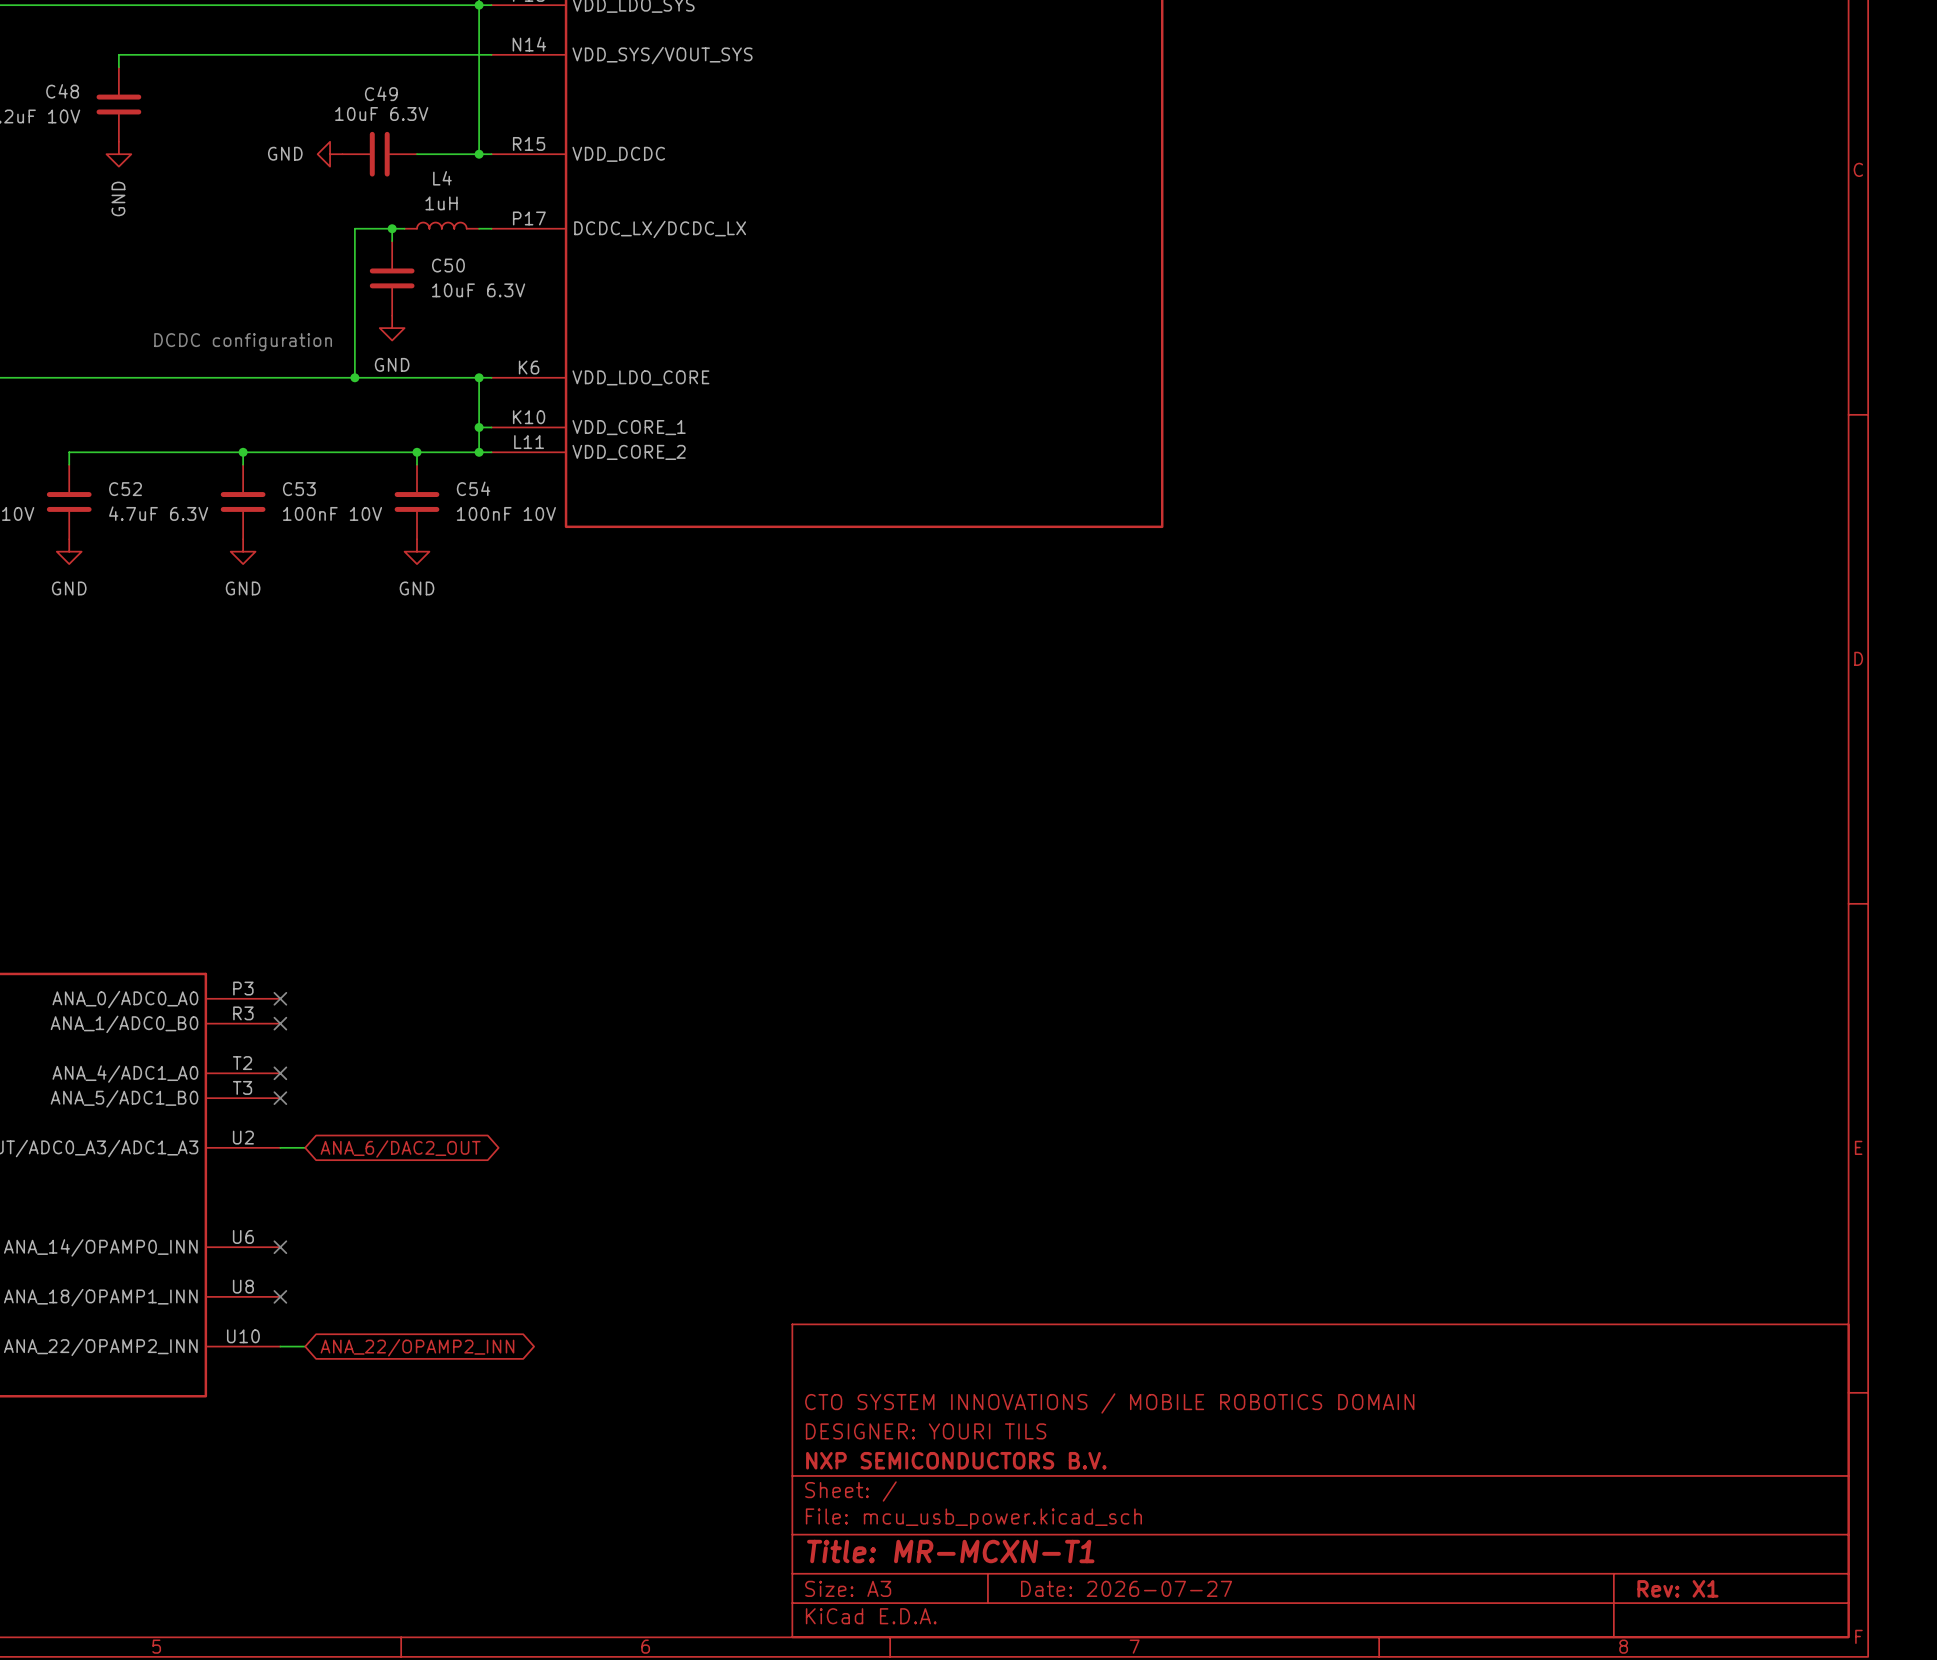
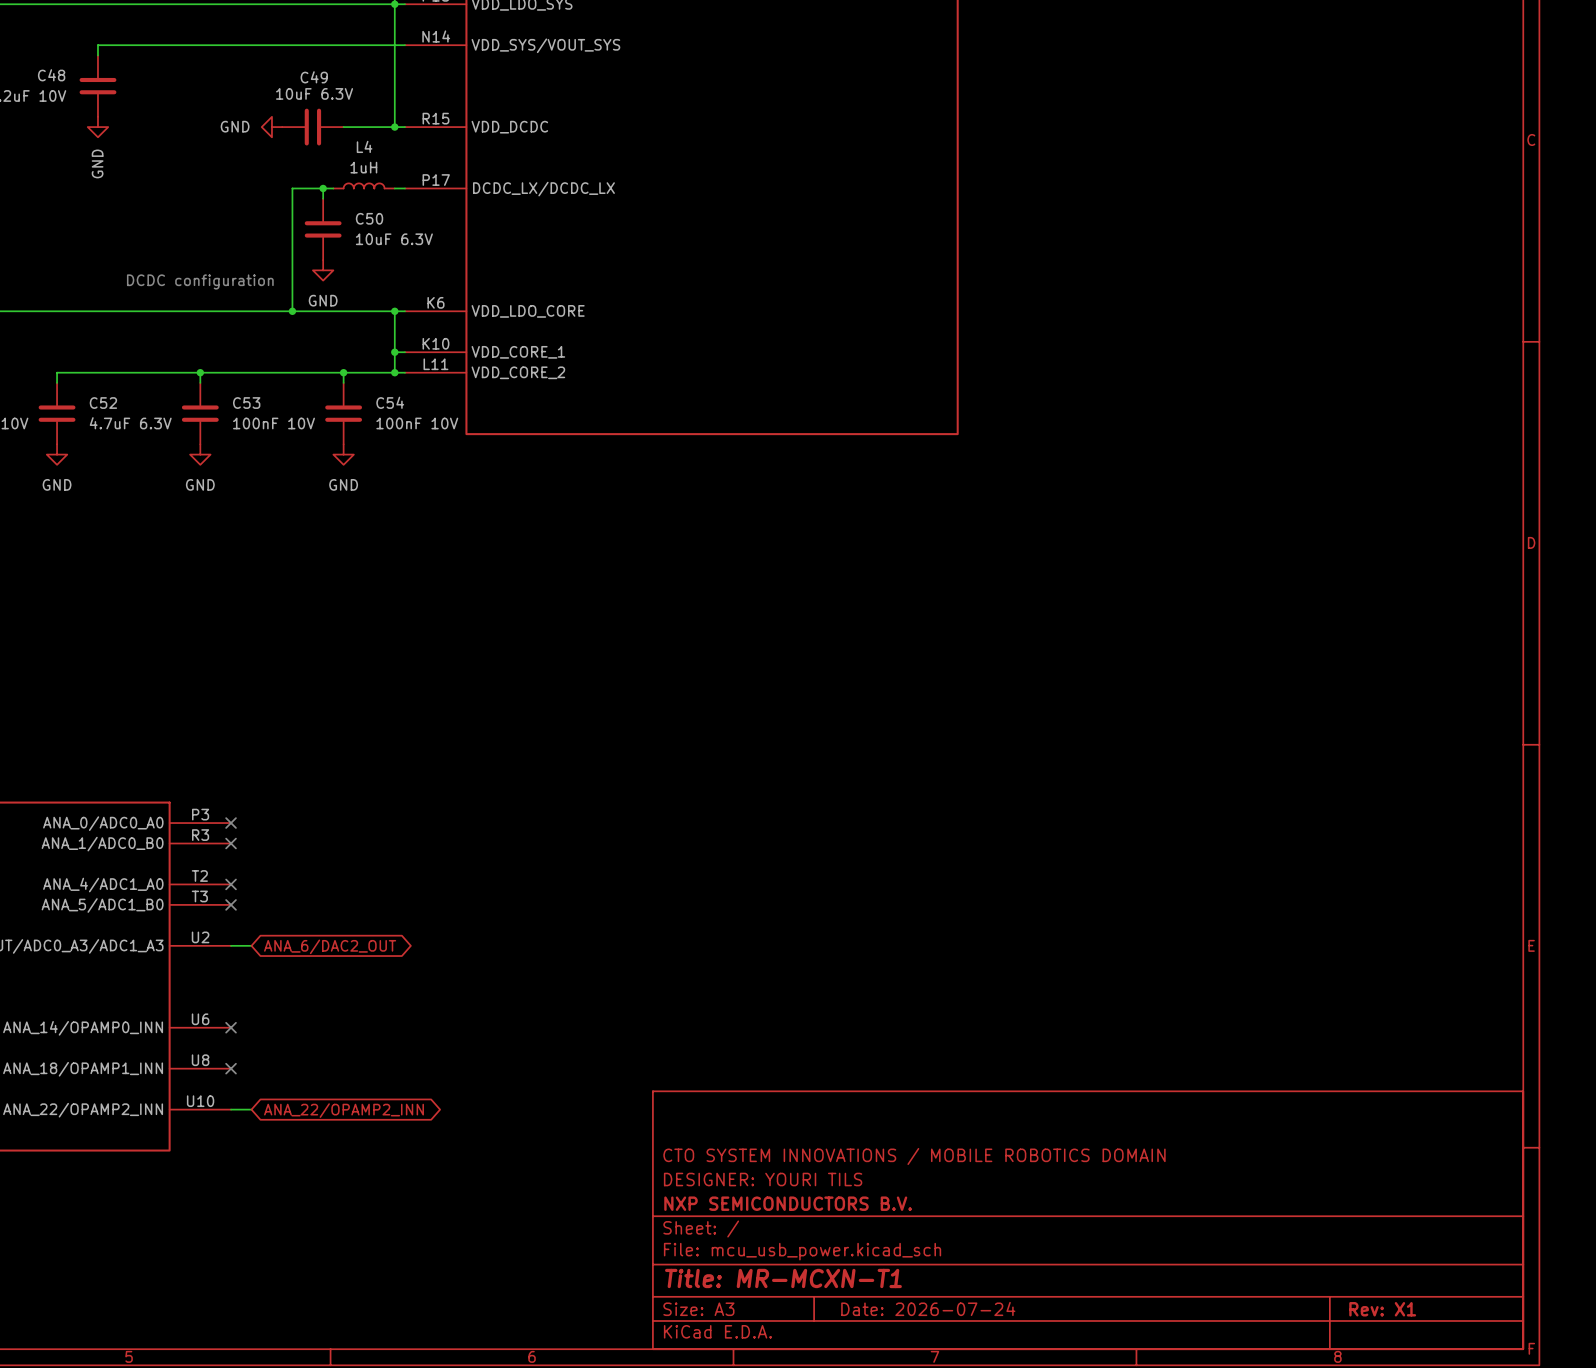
title block: Date: 2026-07-27 (1126, 1588) -> Date: 2026-07-24 (928, 1308)

